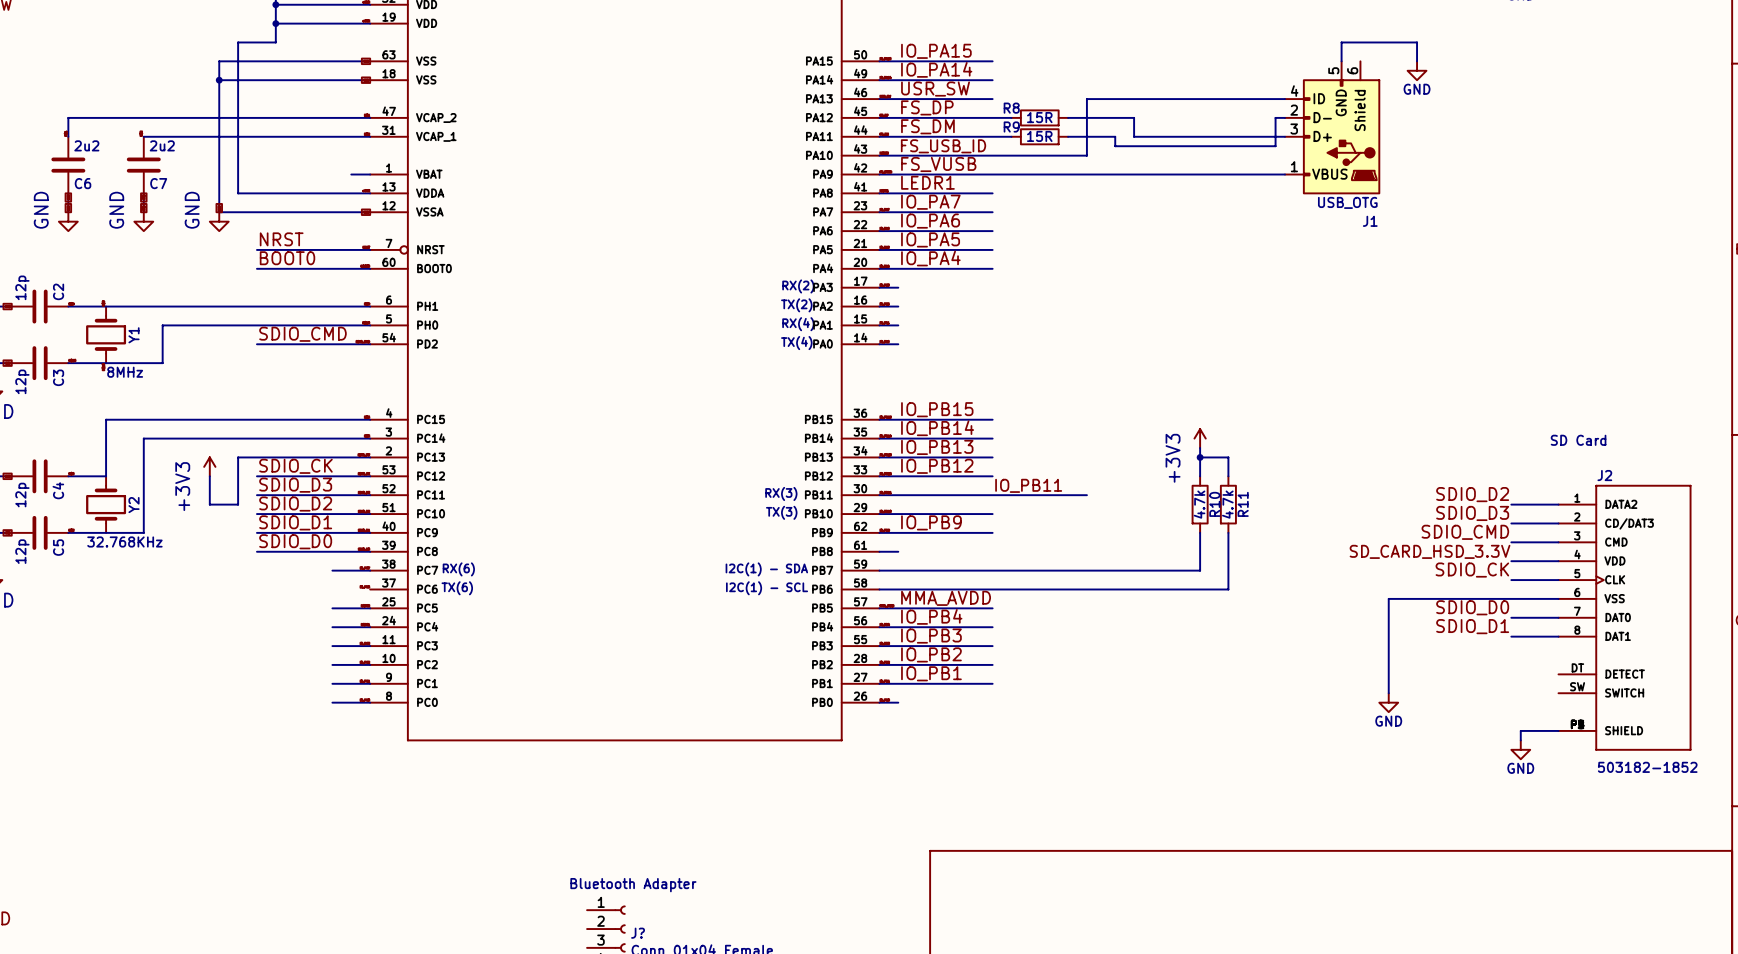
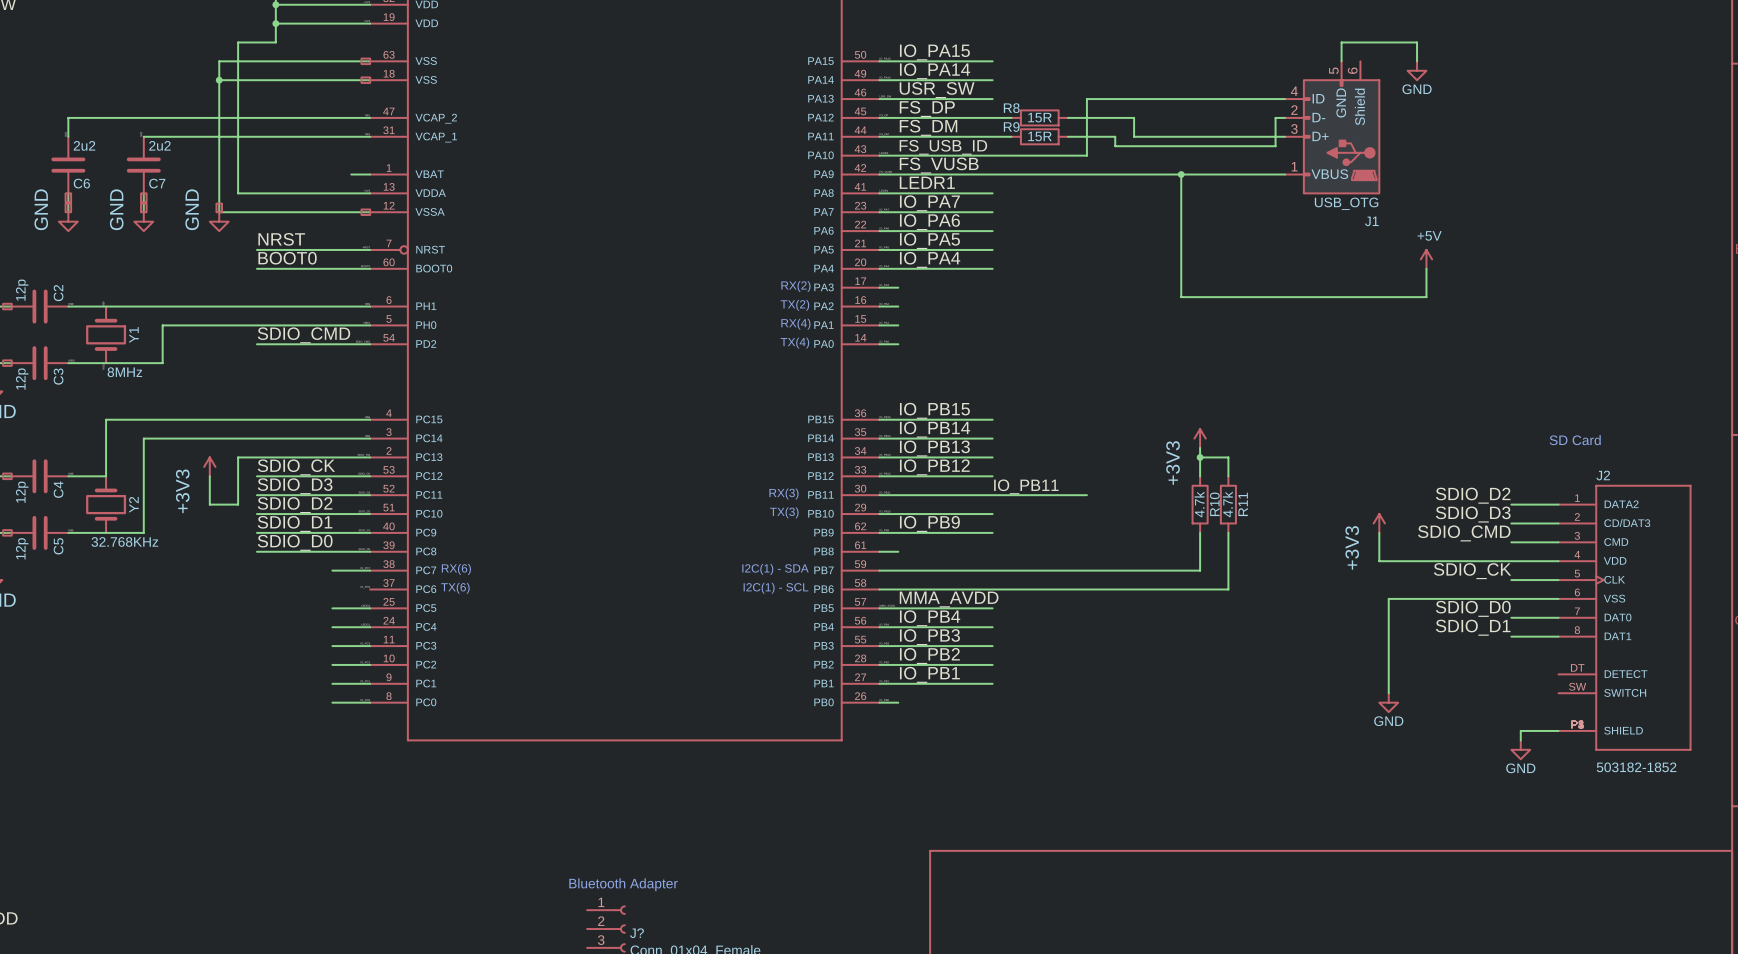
wire: none -> (1181, 174) (1181, 297) (1426, 297) (1426, 268)
junction: none -> (1181, 174)
power symbol: none -> +5V (1426, 259)
power symbol: none -> +3V3 (1379, 523)
wire: none -> (1379, 532) (1379, 561) (1511, 561)
label: SD_CARD_HSD_3.3V (1430, 551) -> none

